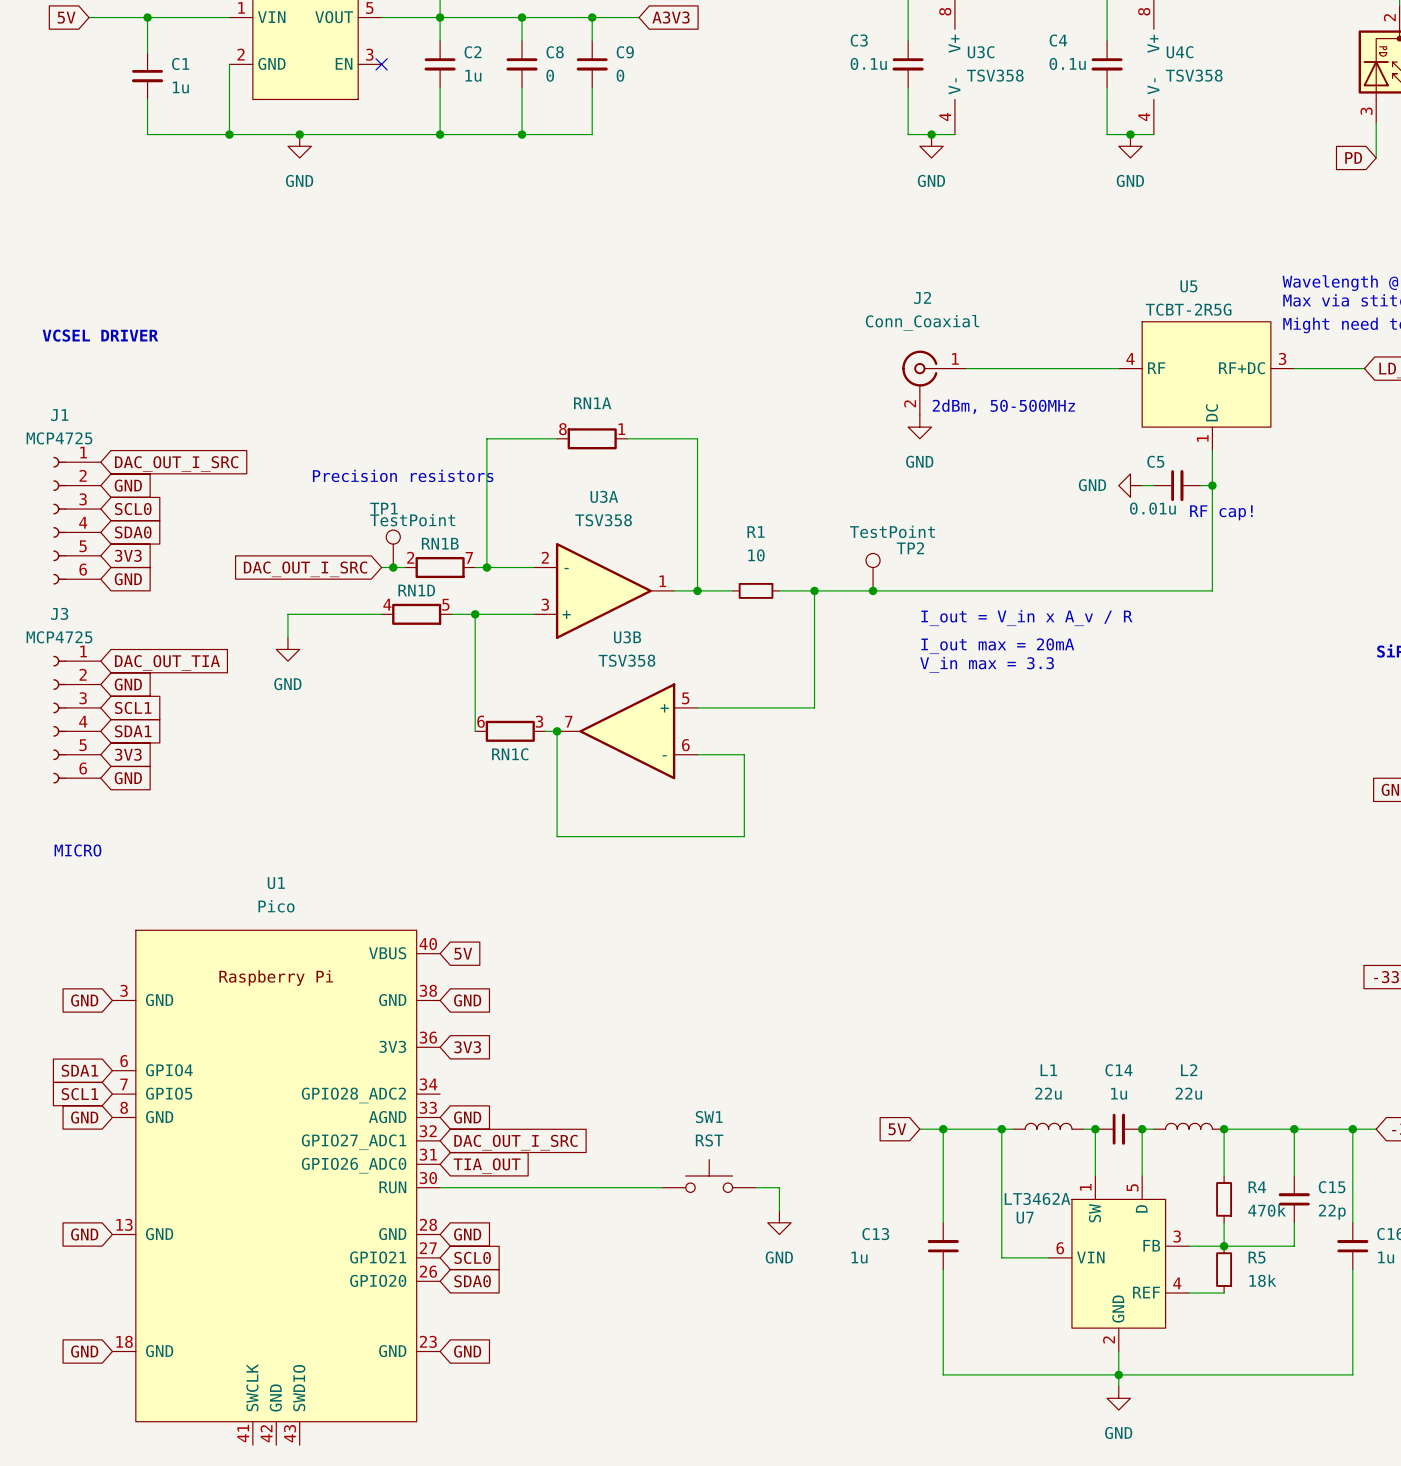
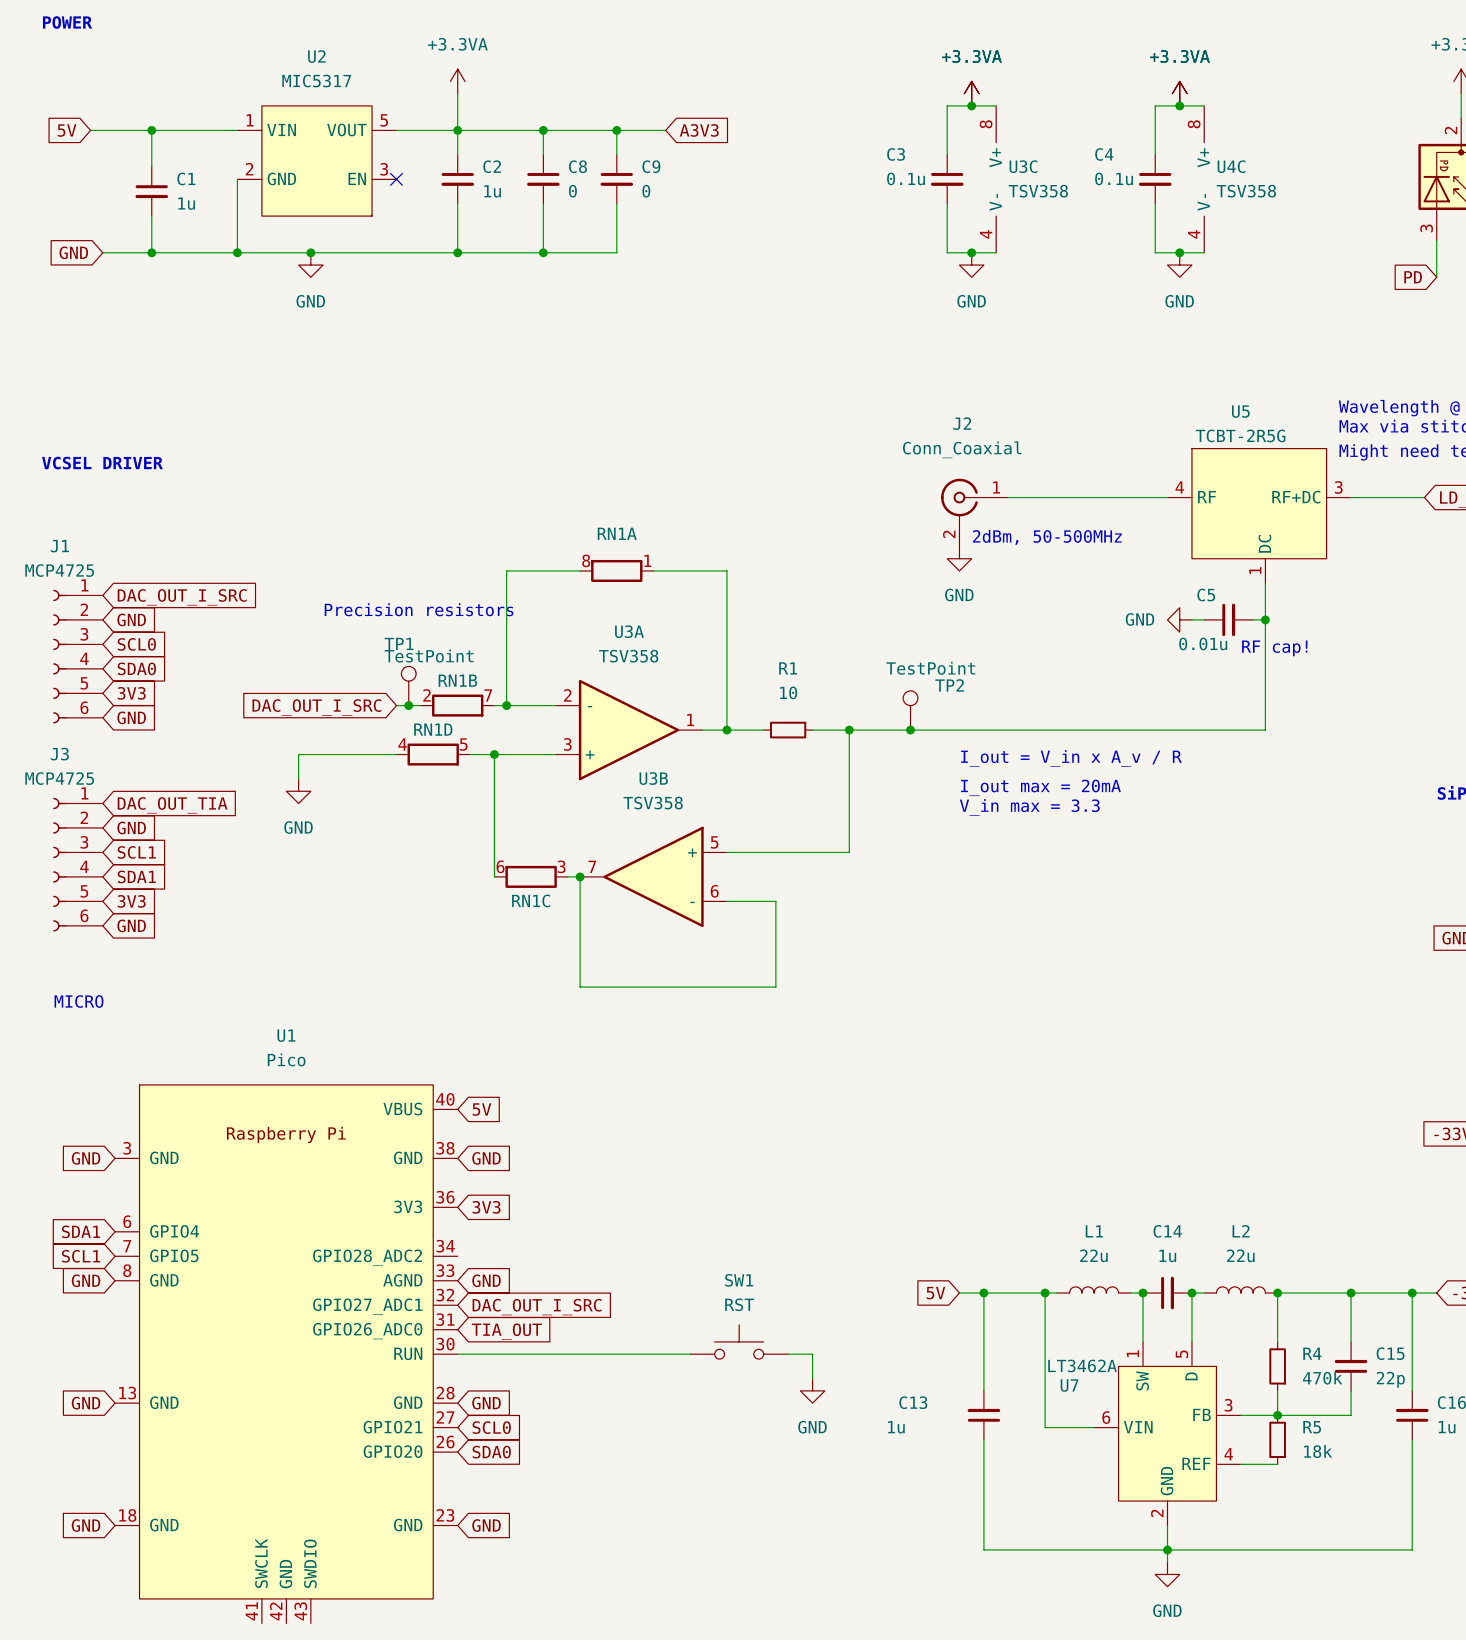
global label: none -> GND (73, 252)
wire: none -> (102, 252) (151, 252)
junction: none -> (151, 252)

